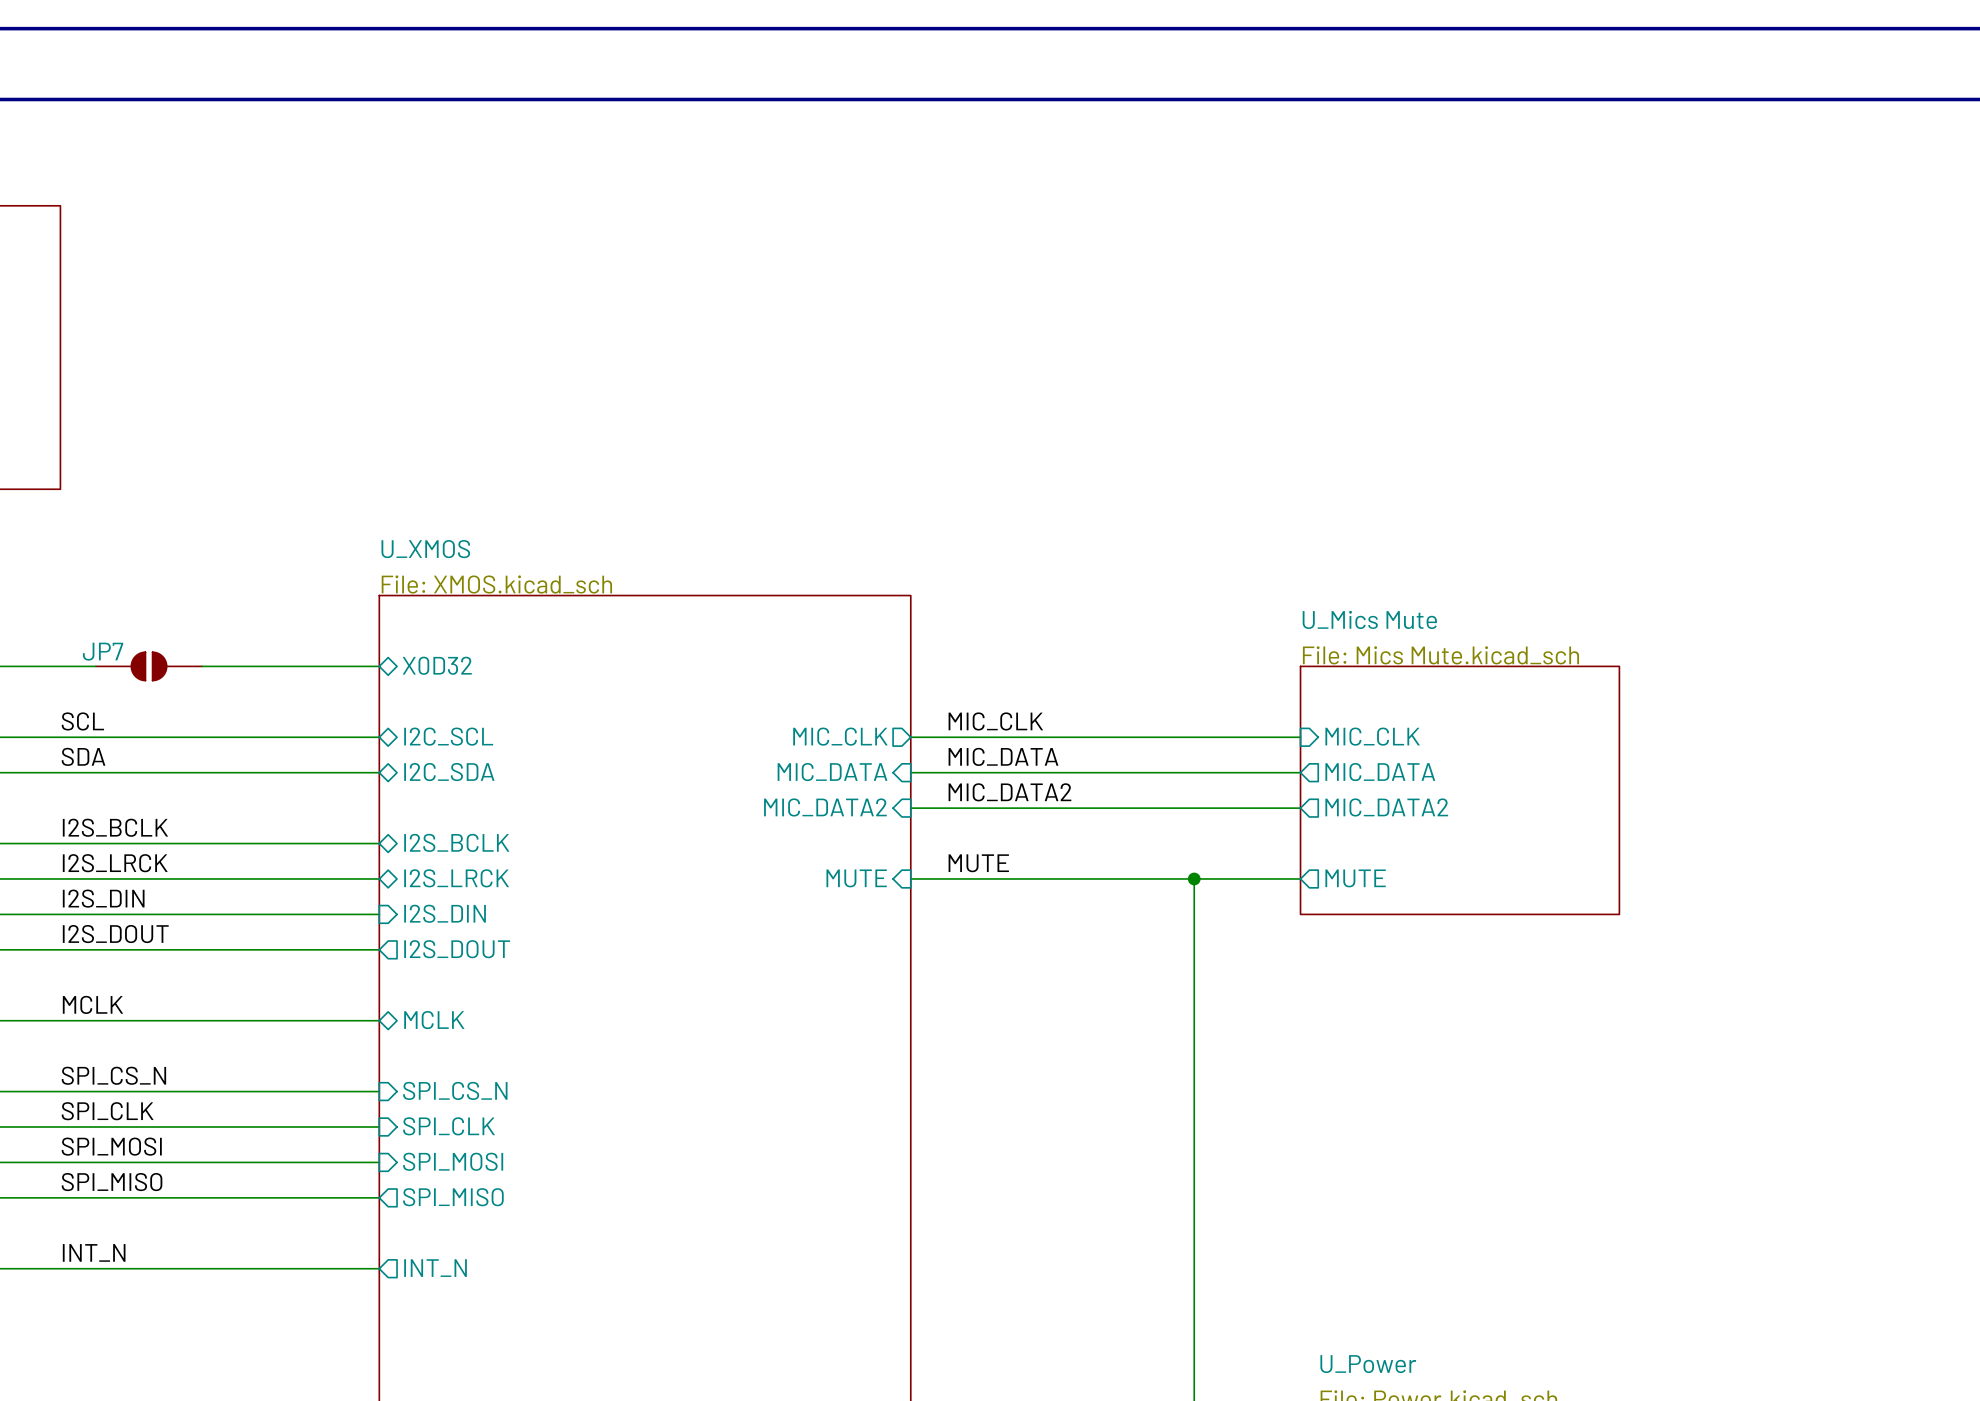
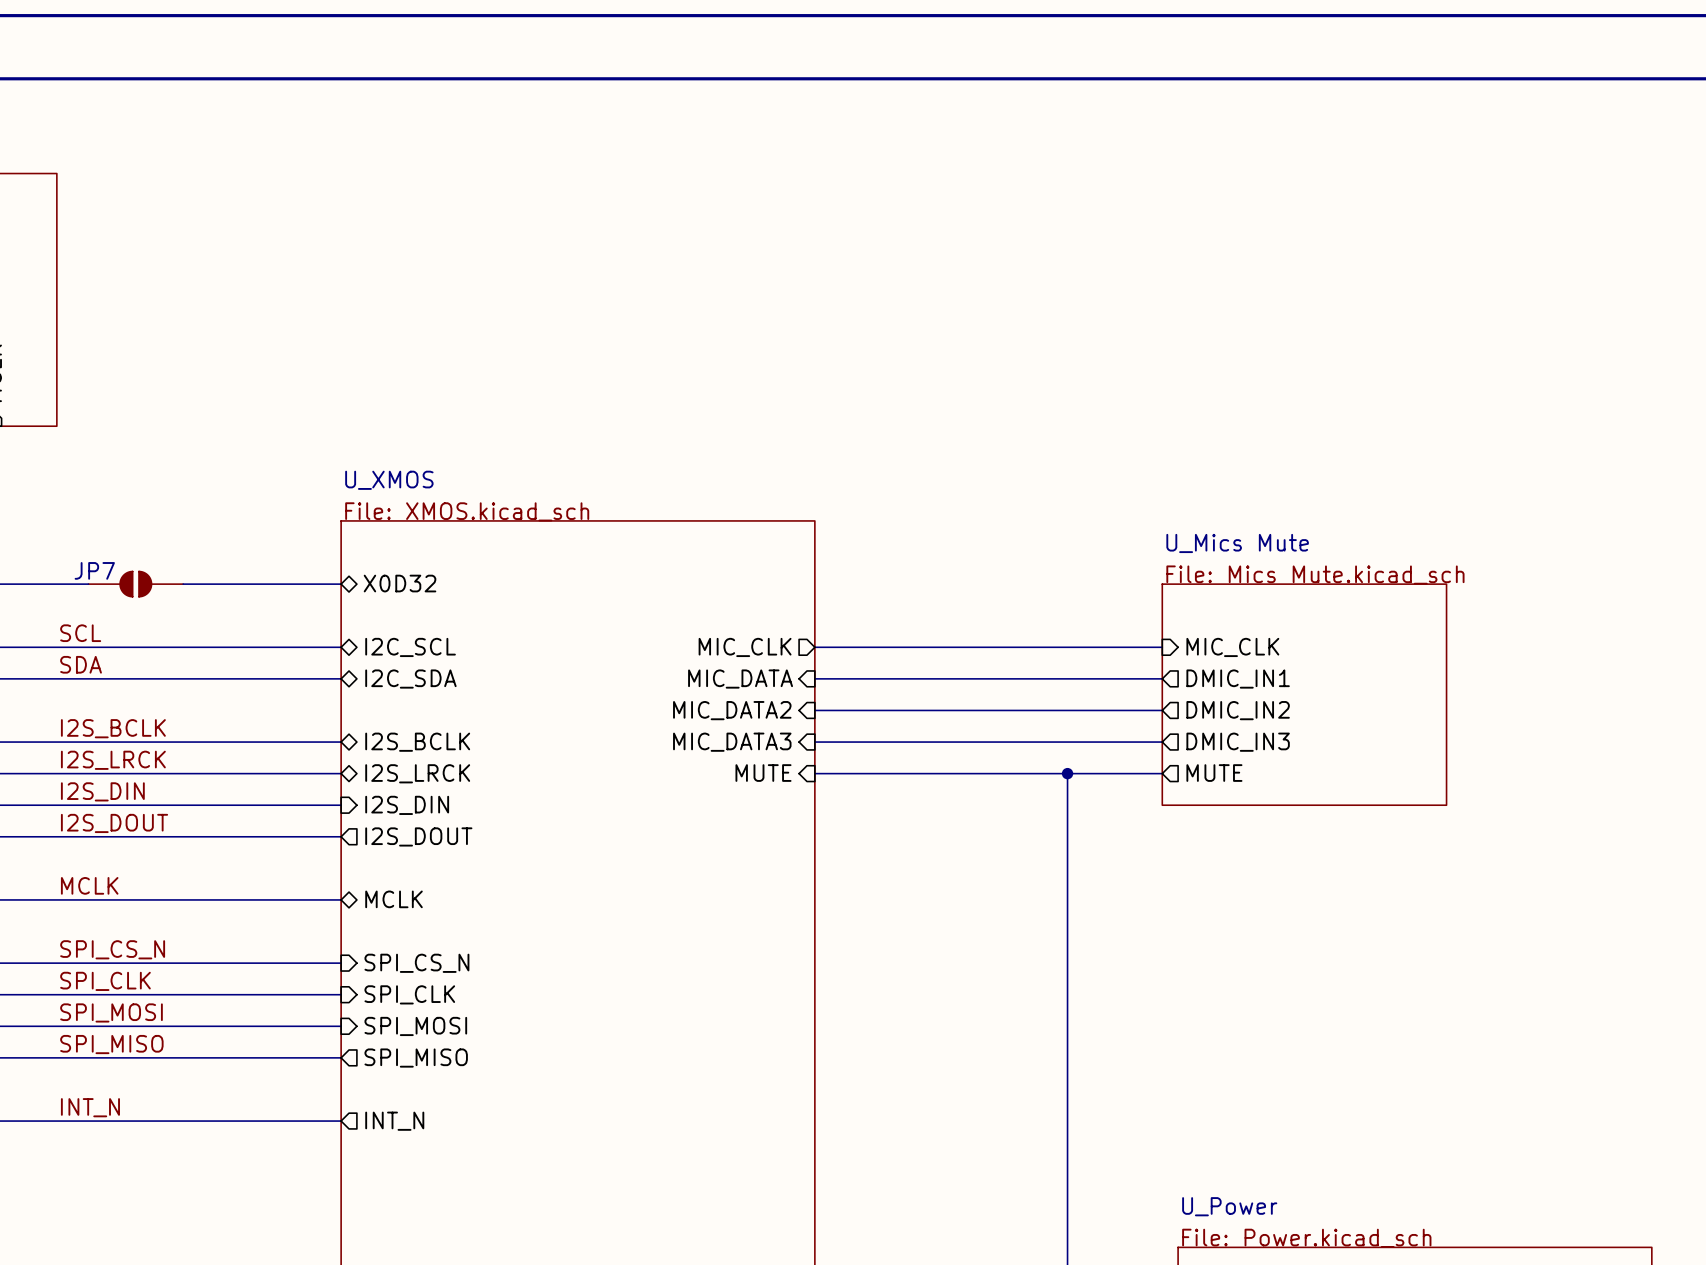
label: MIC_CLK (995, 721) -> none
label: MIC_DATA (1003, 756) -> none
sheet pin: MIC_DATA (1380, 772) -> DMIC_IN1 (1238, 679)
label: MIC_DATA2 (1009, 792) -> none
sheet pin: MIC_DATA2 (1386, 807) -> DMIC_IN2 (1238, 710)
sheet pin: none -> MIC_DATA3 (732, 742)
sheet pin: none -> DMIC_IN3 (1238, 742)
wire: none -> (814, 742) (1162, 742)
label: MUTE (978, 863) -> none

